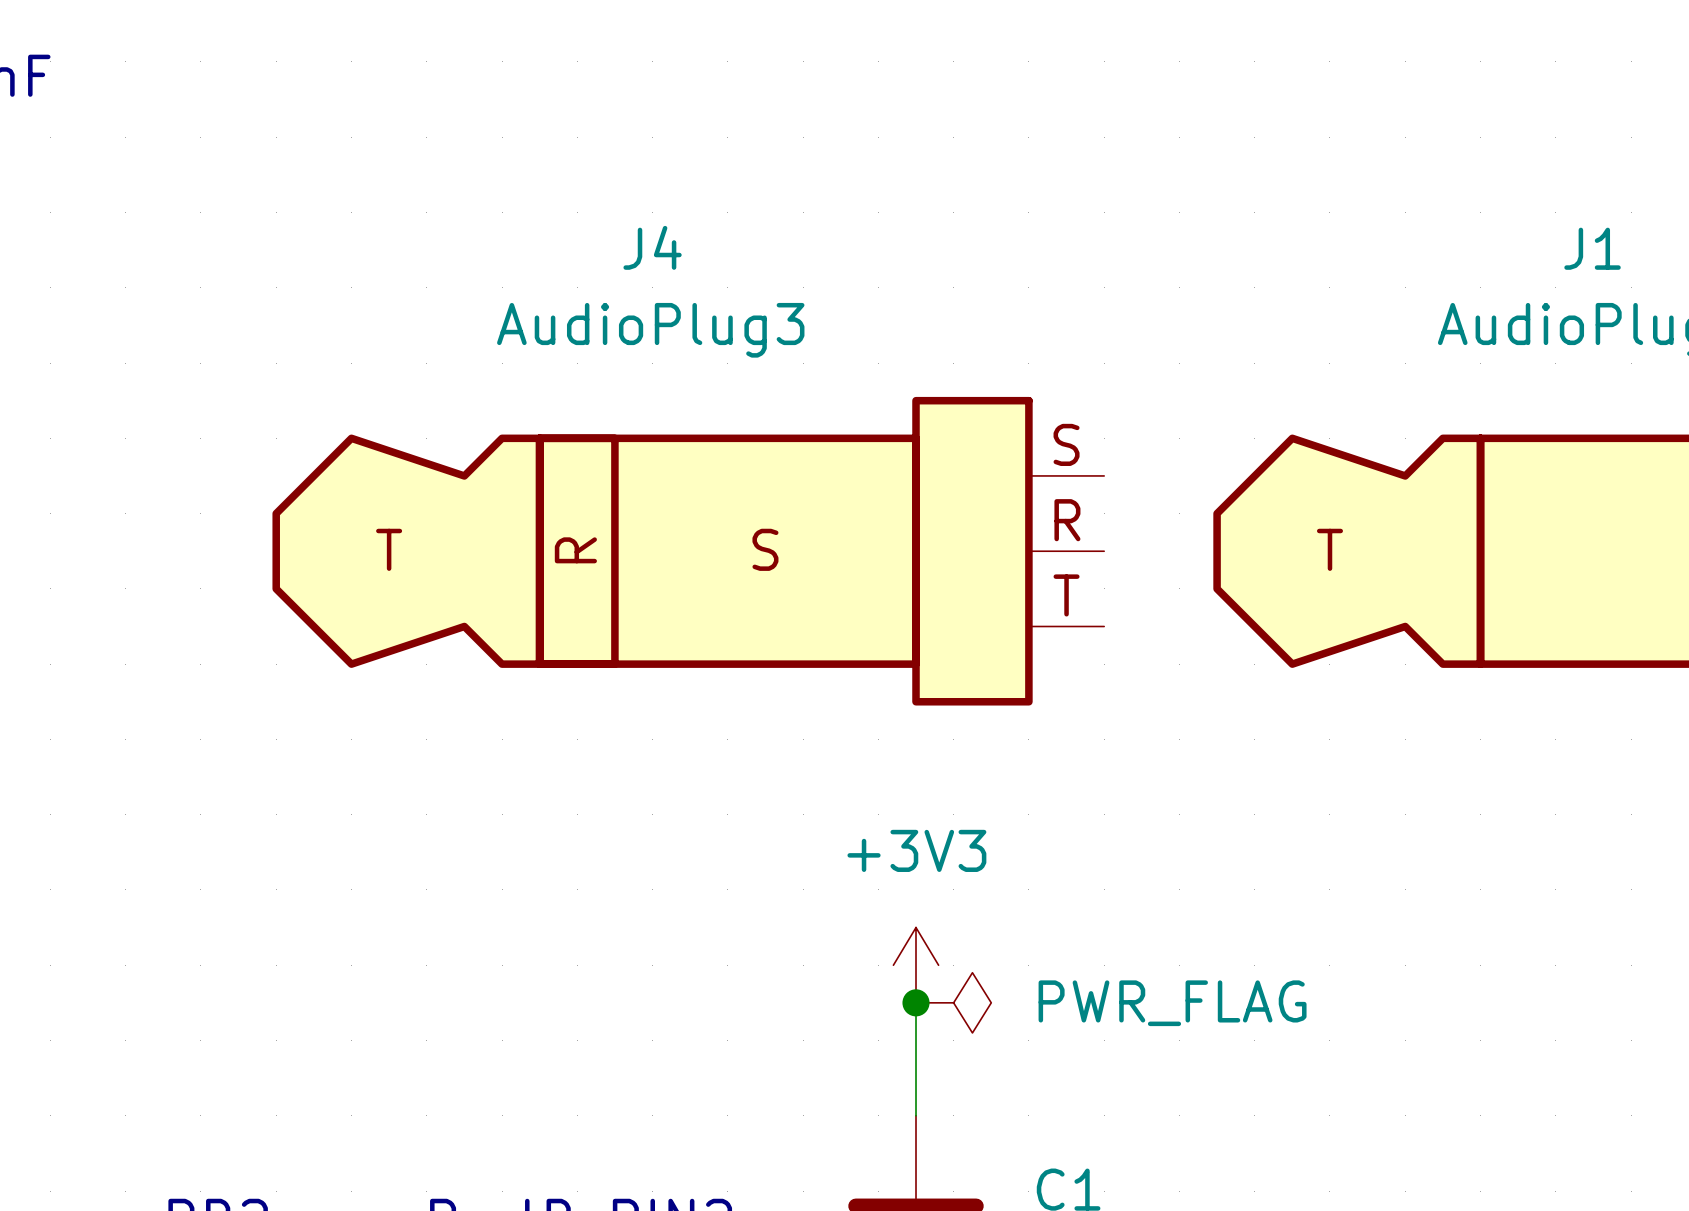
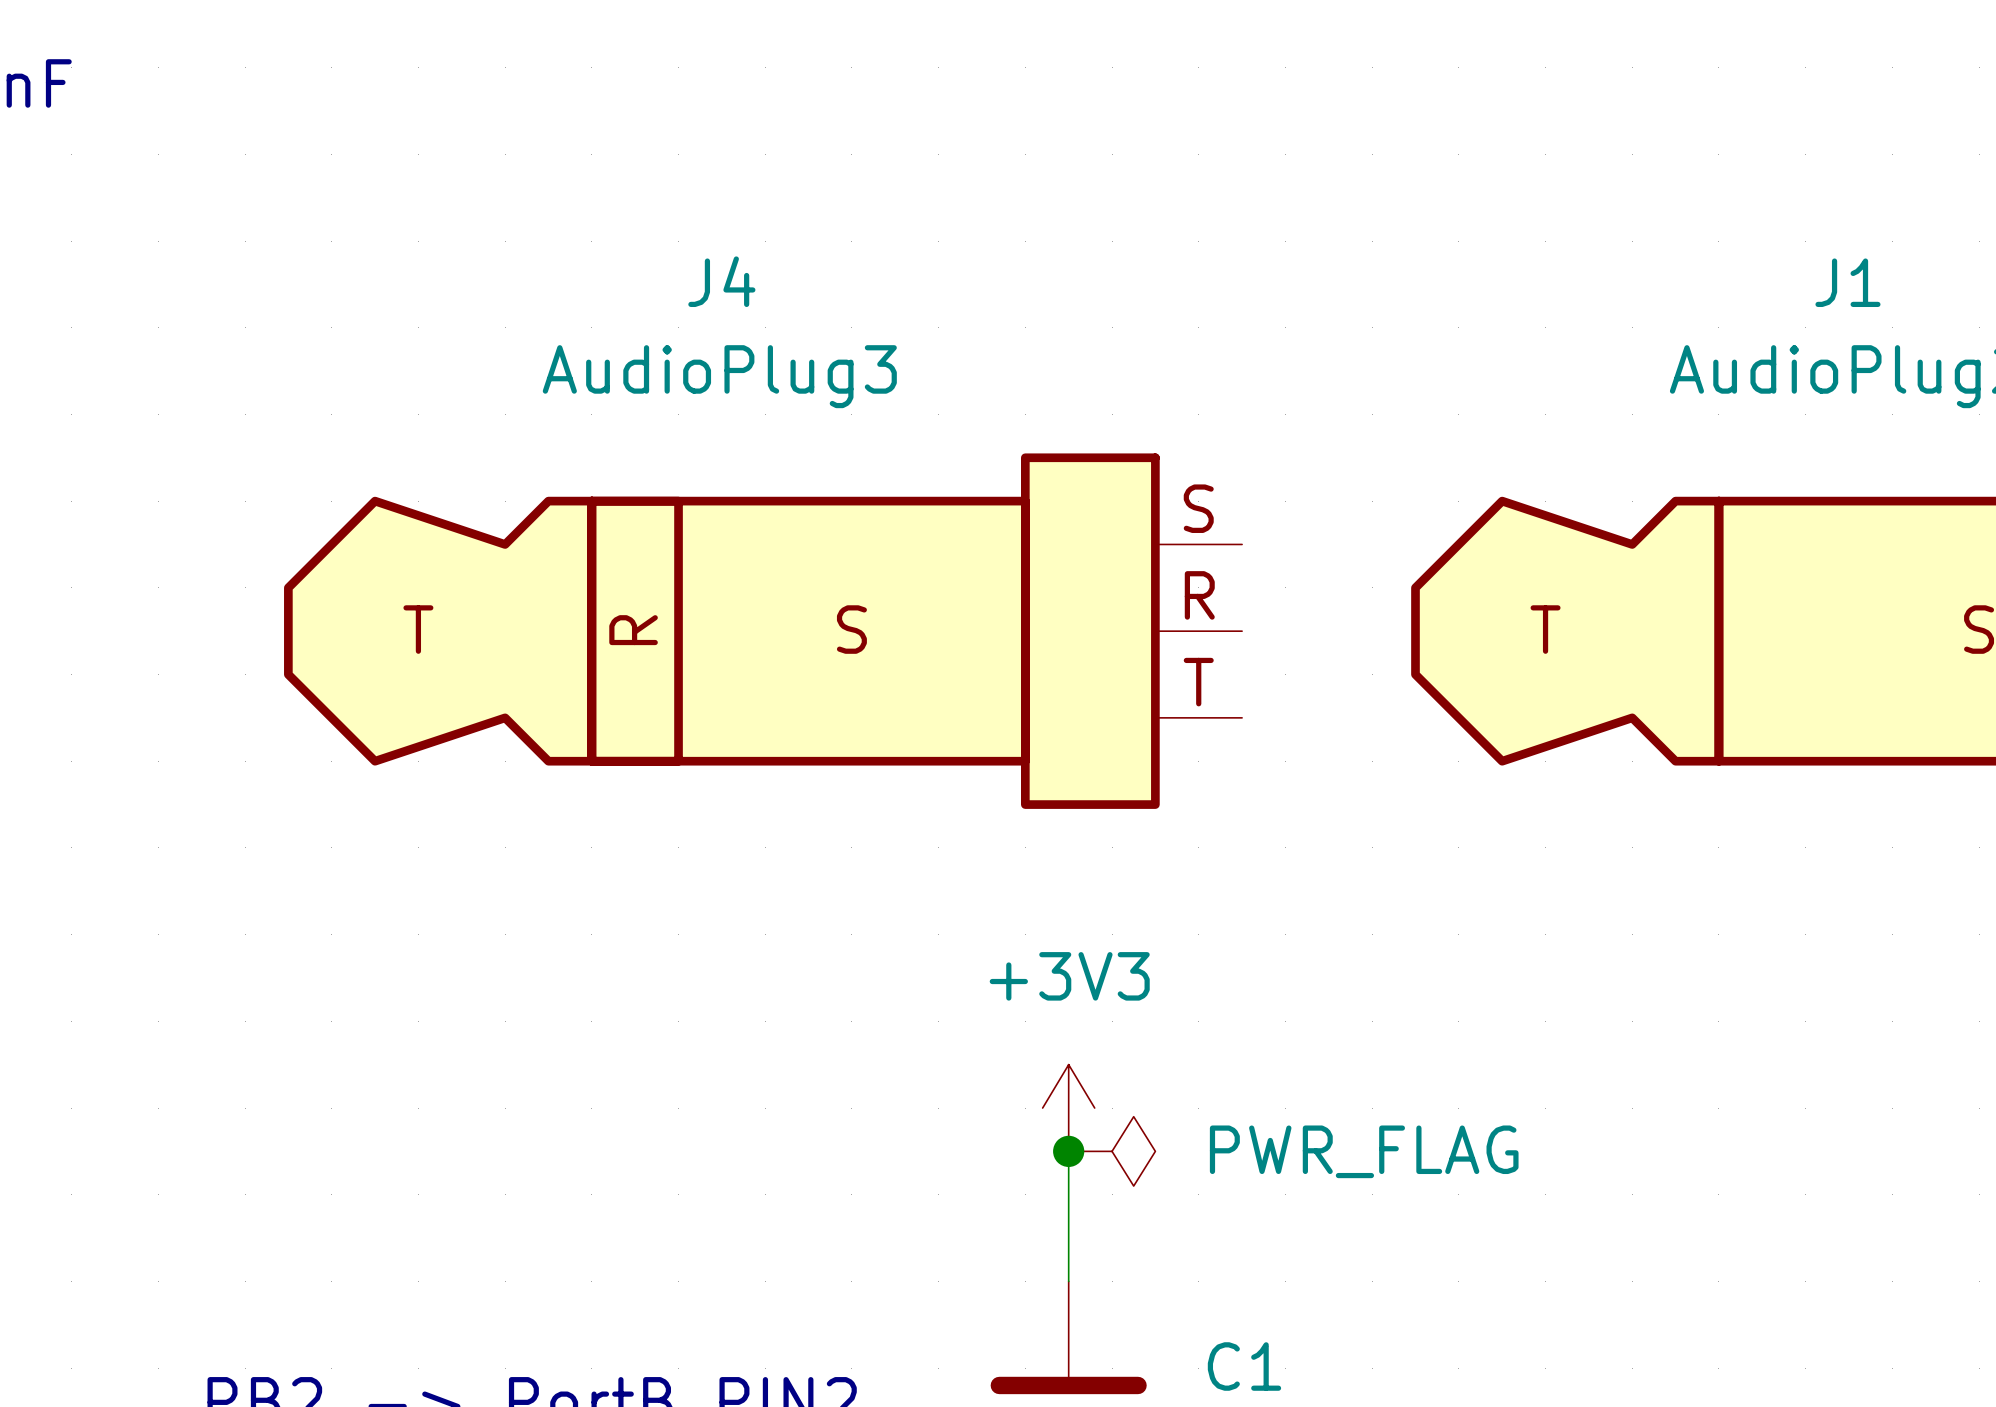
J4 position: (688, 551) -> (763, 631)

